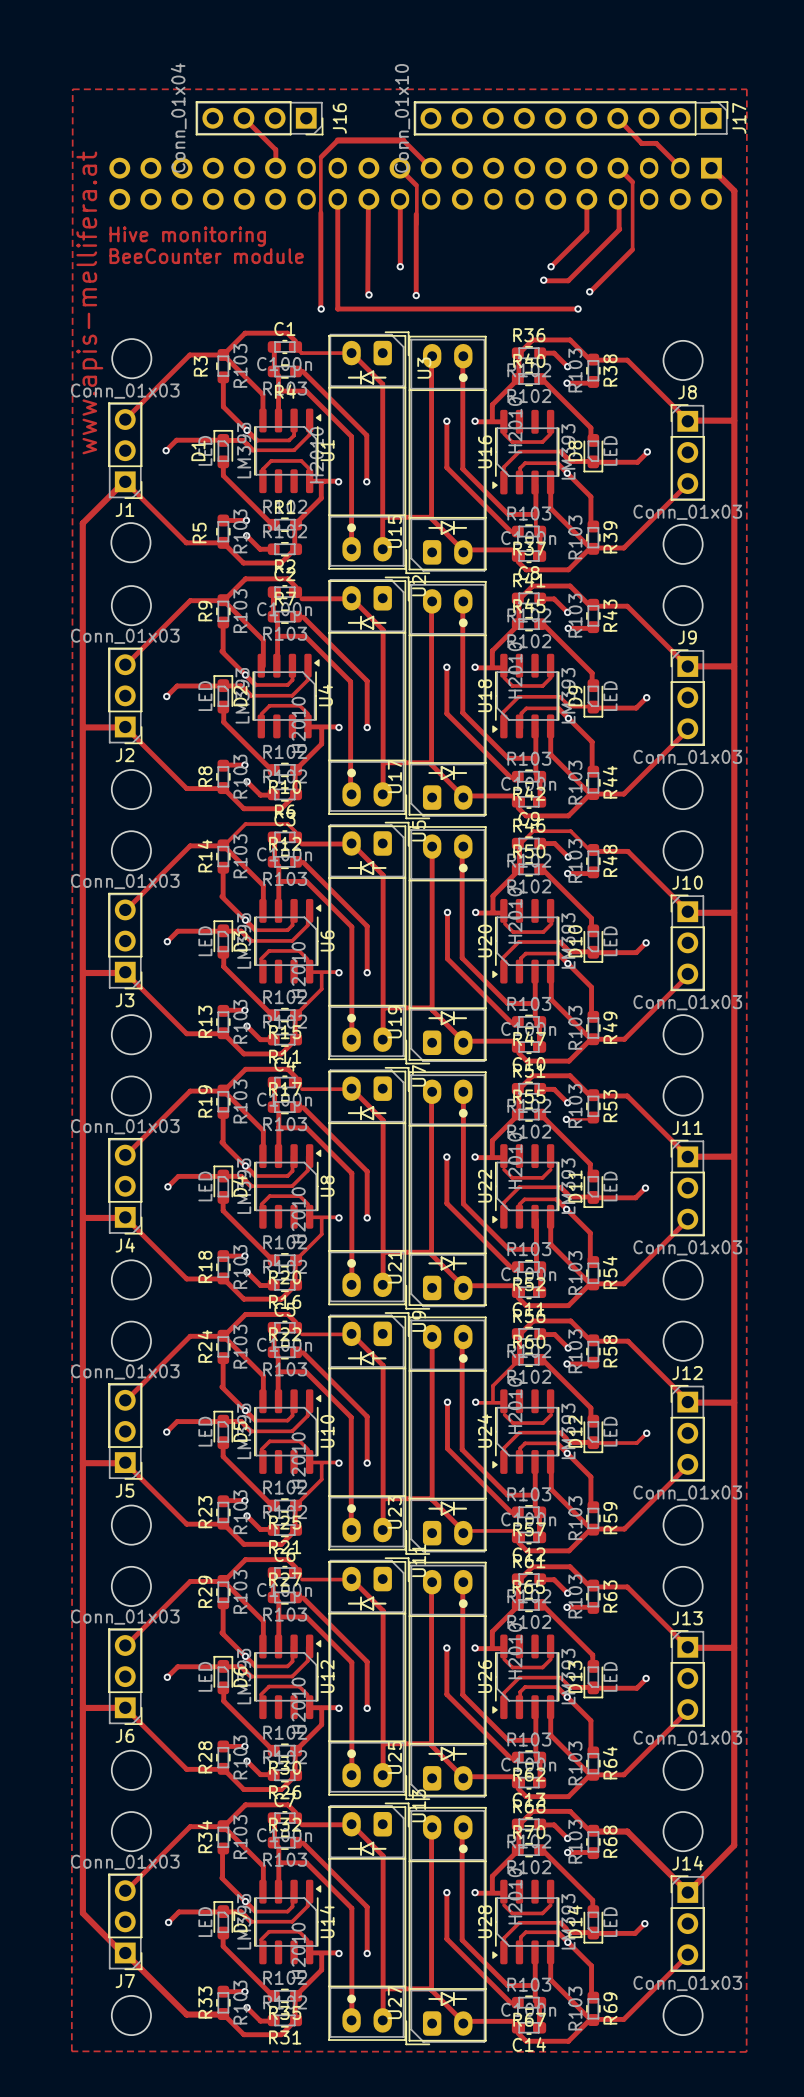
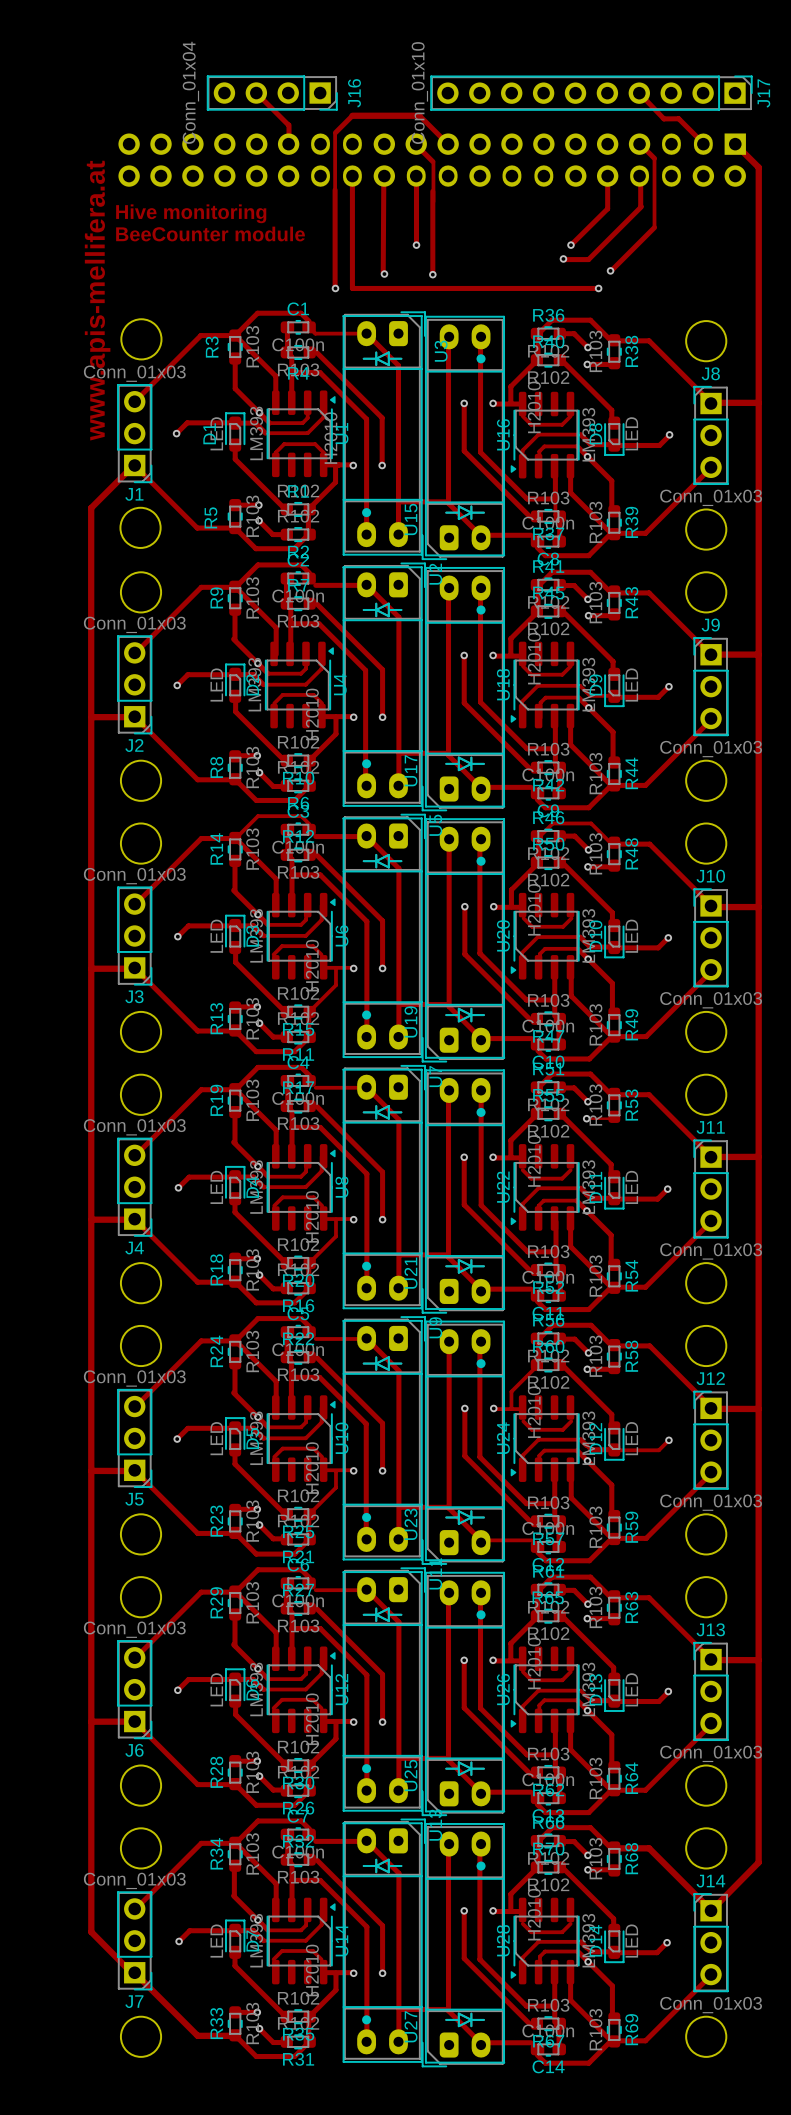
zone outline: (72, 89) (71, 2051) (746, 2051) (746, 89) (72, 89) -> none

